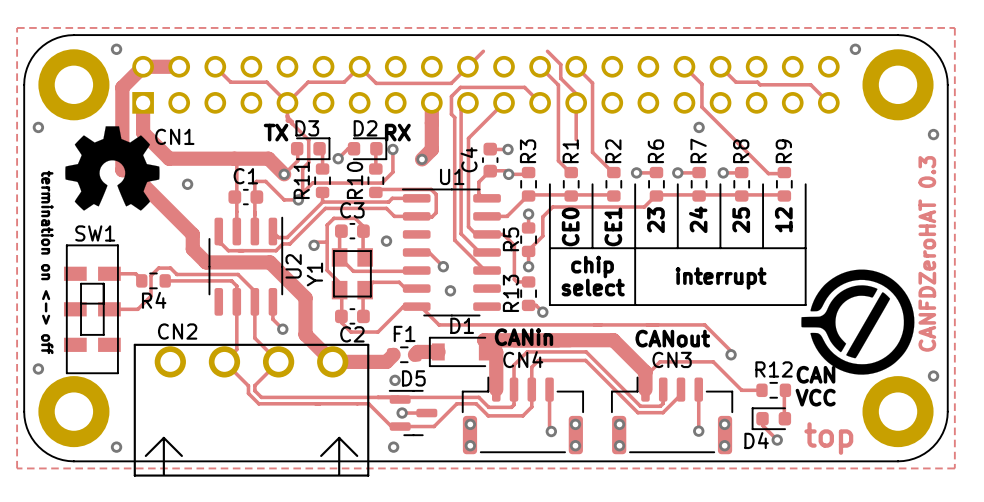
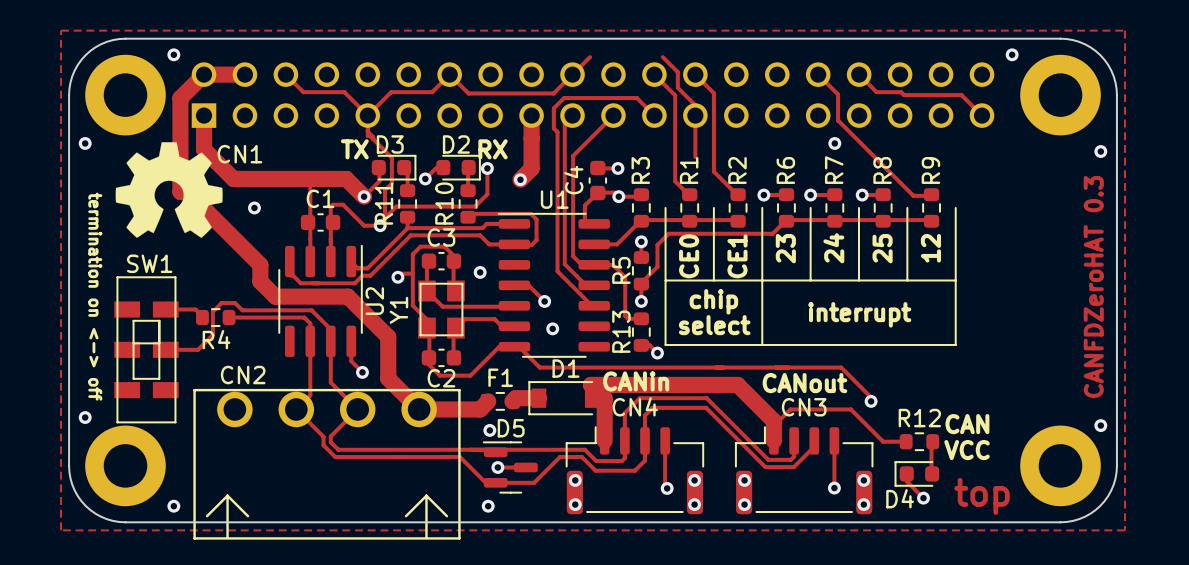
drawing: [801, 269, 915, 375] -> none

